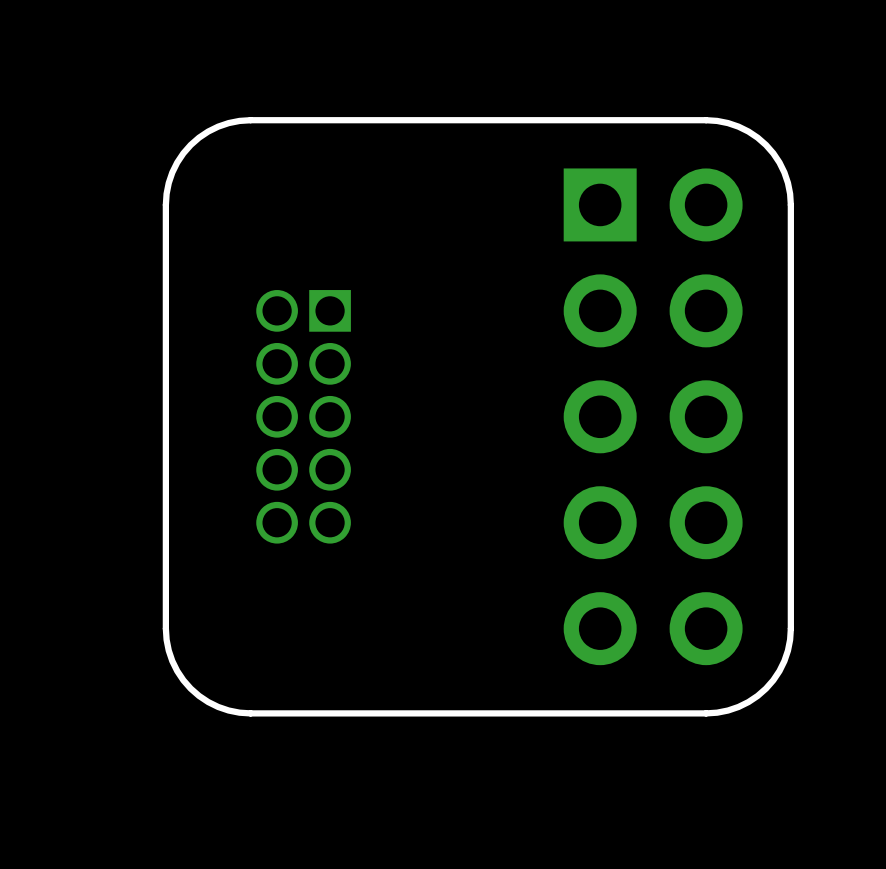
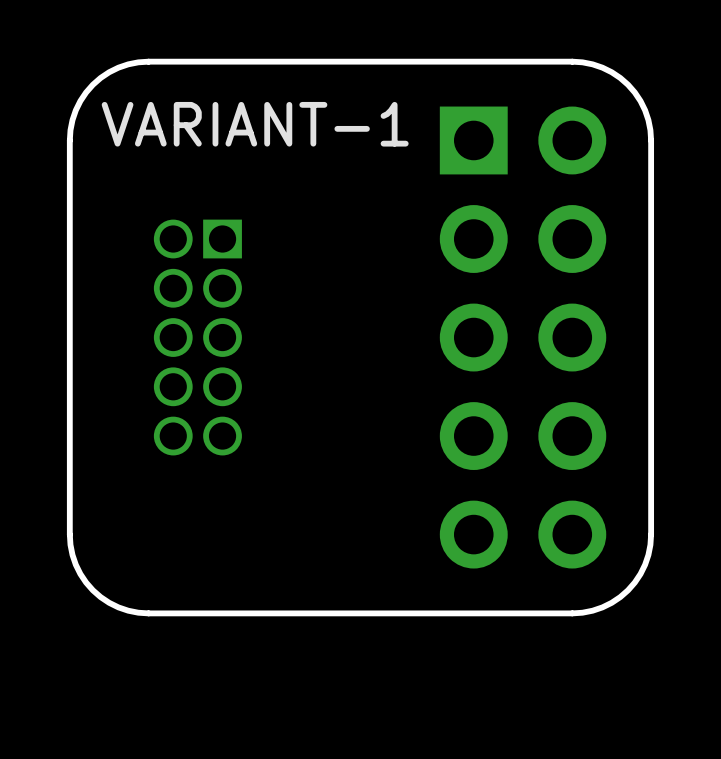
text: none -> VARIANT-1 (255, 124)

